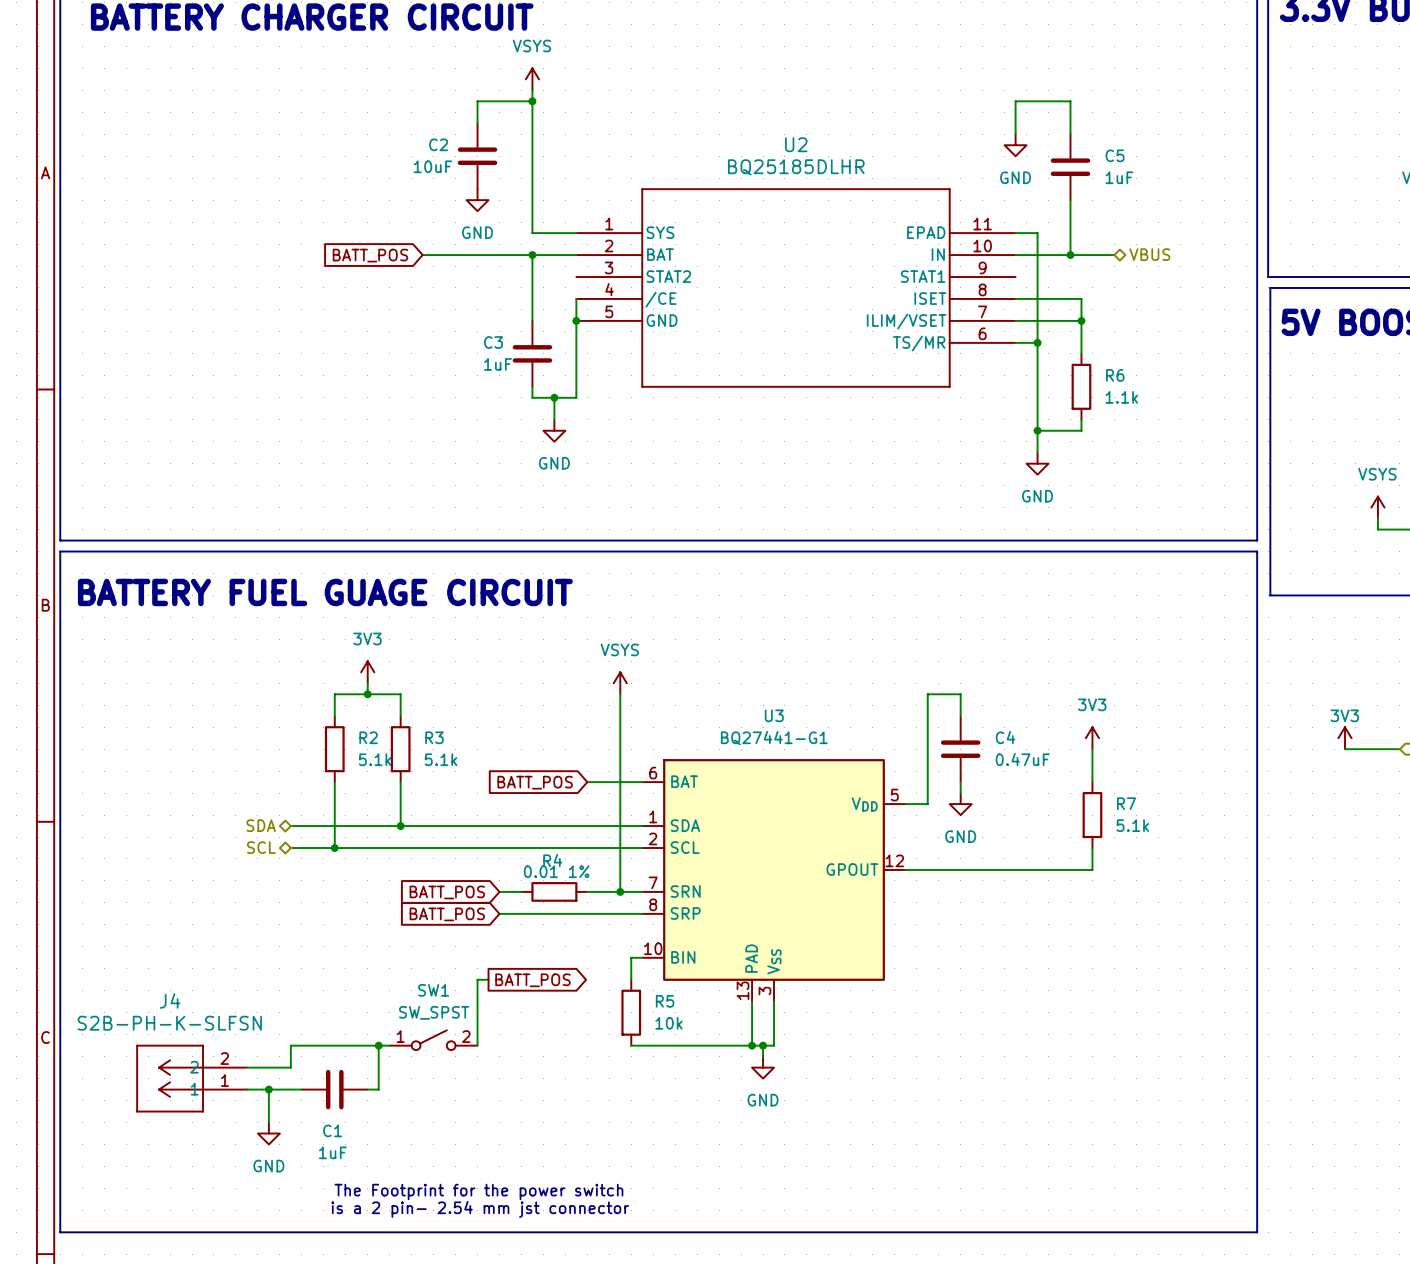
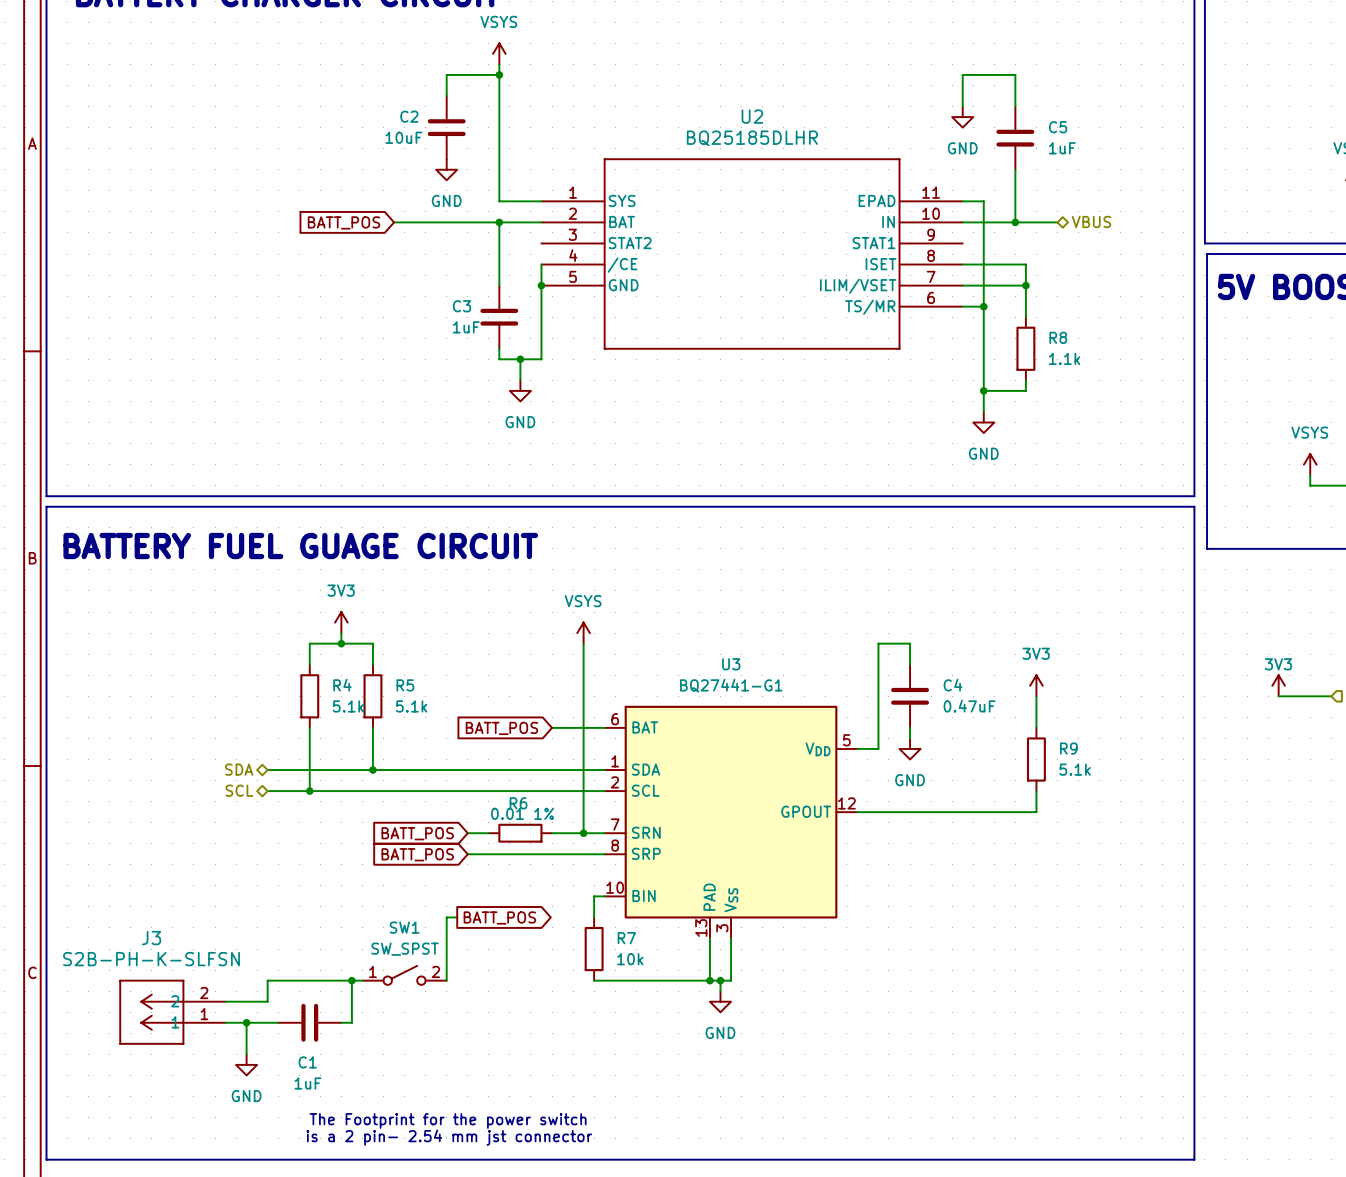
R6 name: R6 (1115, 375) -> R8 (1058, 337)
R2 name: R2 (368, 737) -> R4 (342, 685)
R3 name: R3 (434, 737) -> R5 (405, 685)
R7 name: R7 (1126, 803) -> R9 (1068, 748)
R4 name: R4 (552, 860) -> R6 (518, 803)
J4 name: J4 (170, 1000) -> J3 (151, 938)
R5 name: R5 (665, 1001) -> R7 (626, 938)

